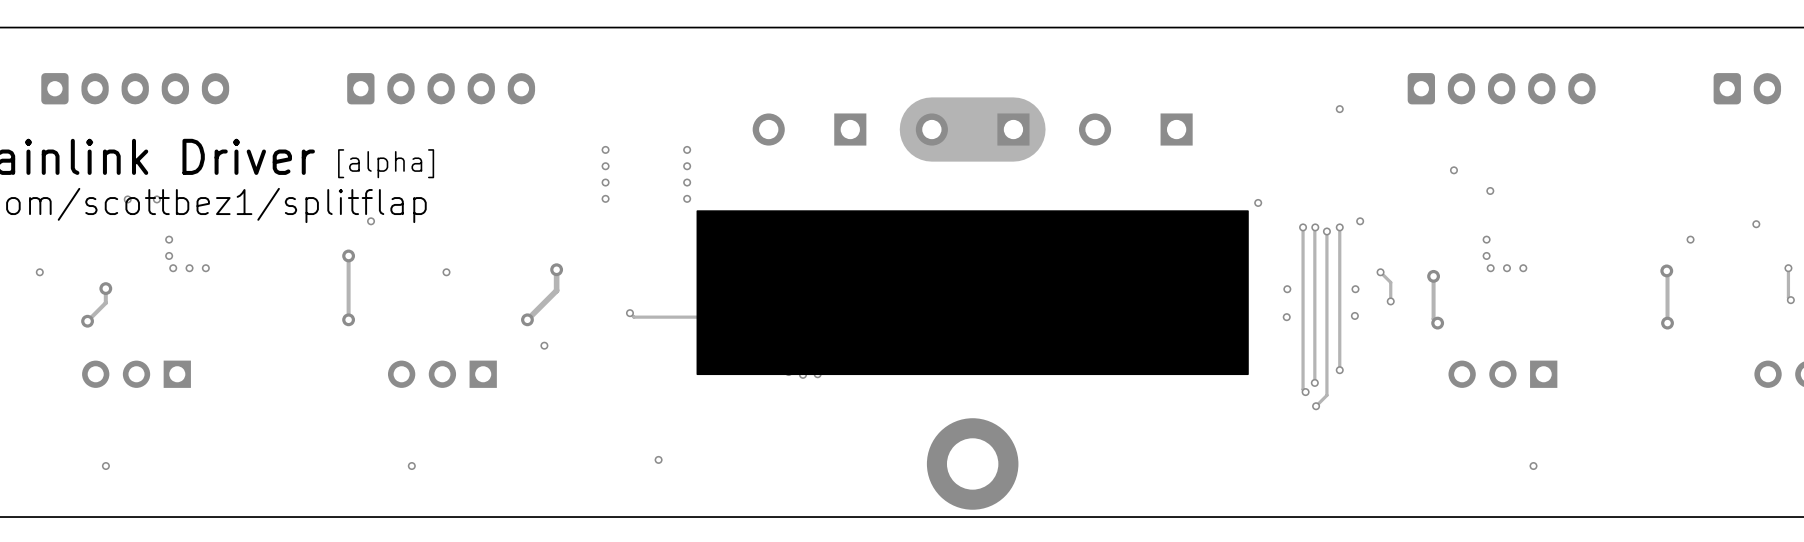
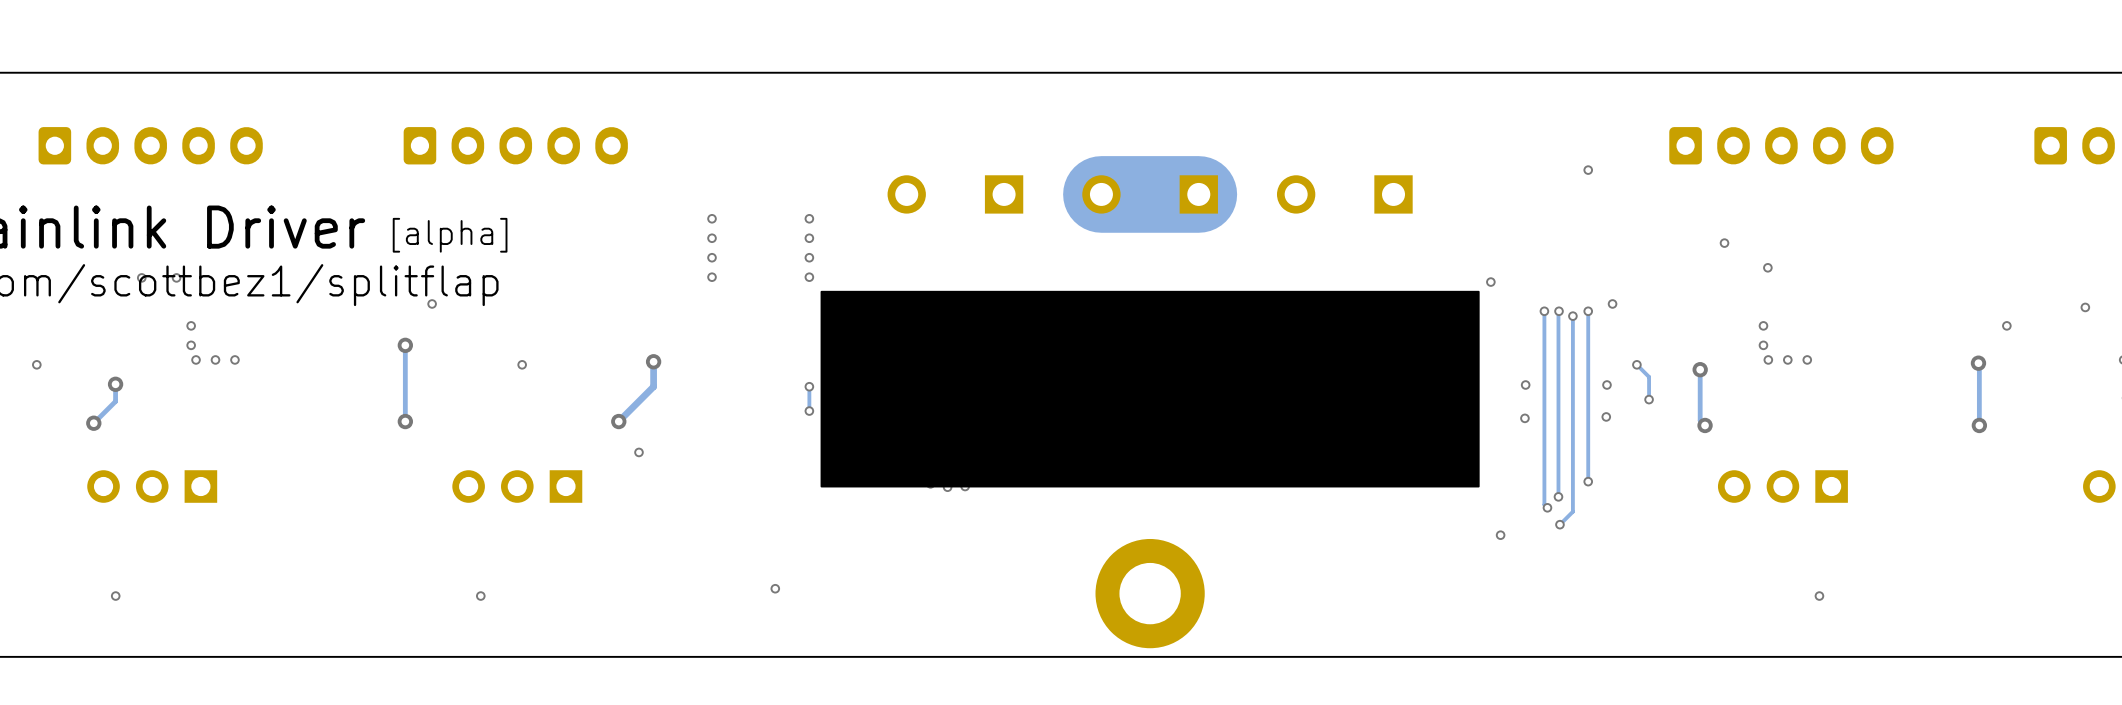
track: none -> (809, 386) (809, 411)
via: none -> (809, 386)
via: none -> (809, 411)
track: (629, 313) (633, 317) (715, 317) -> none
via: (629, 313) -> none
via: none -> (1500, 535)

